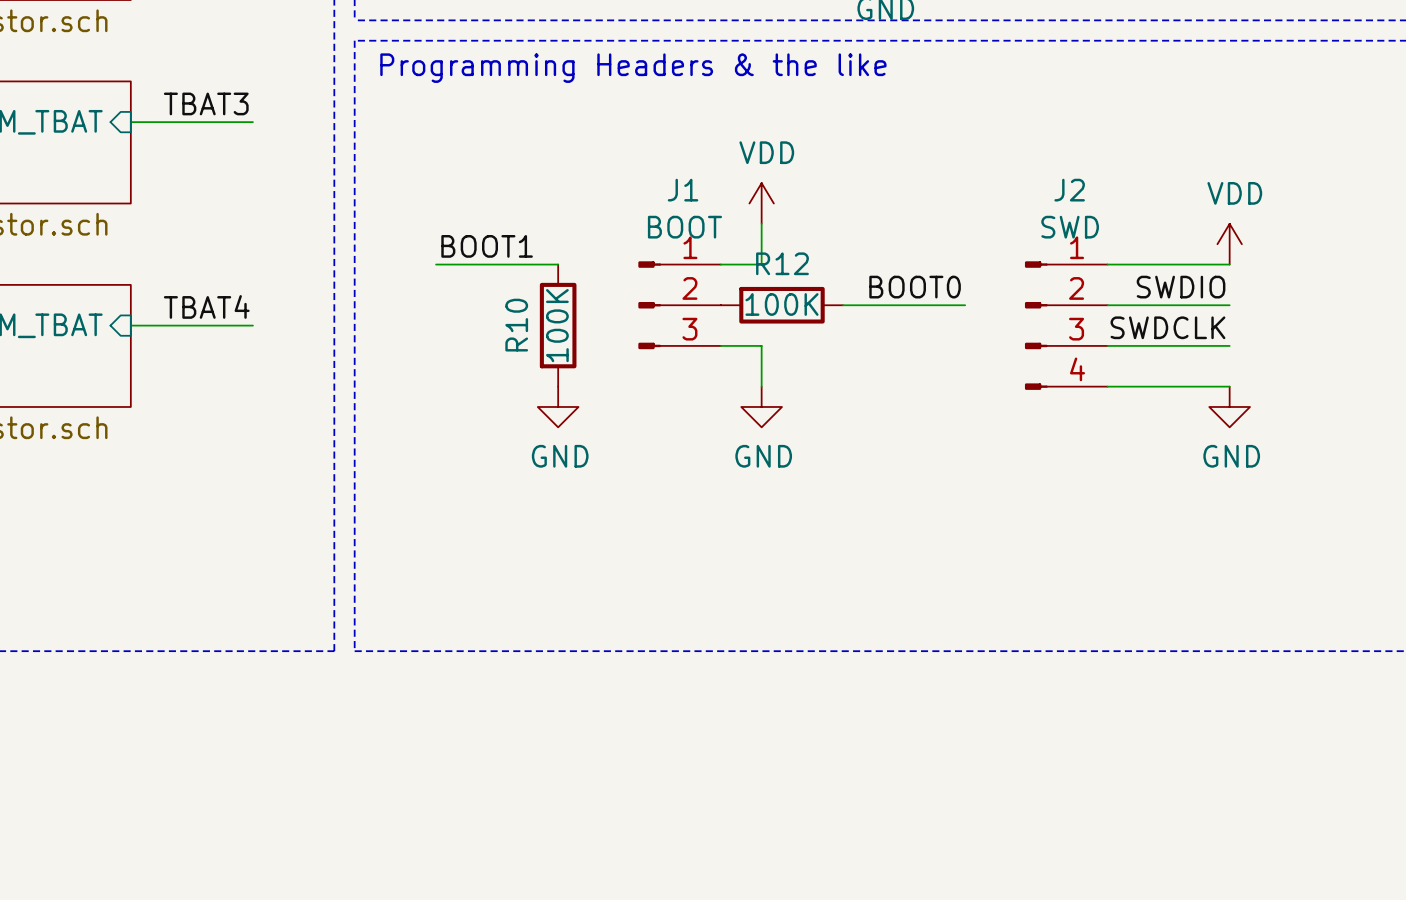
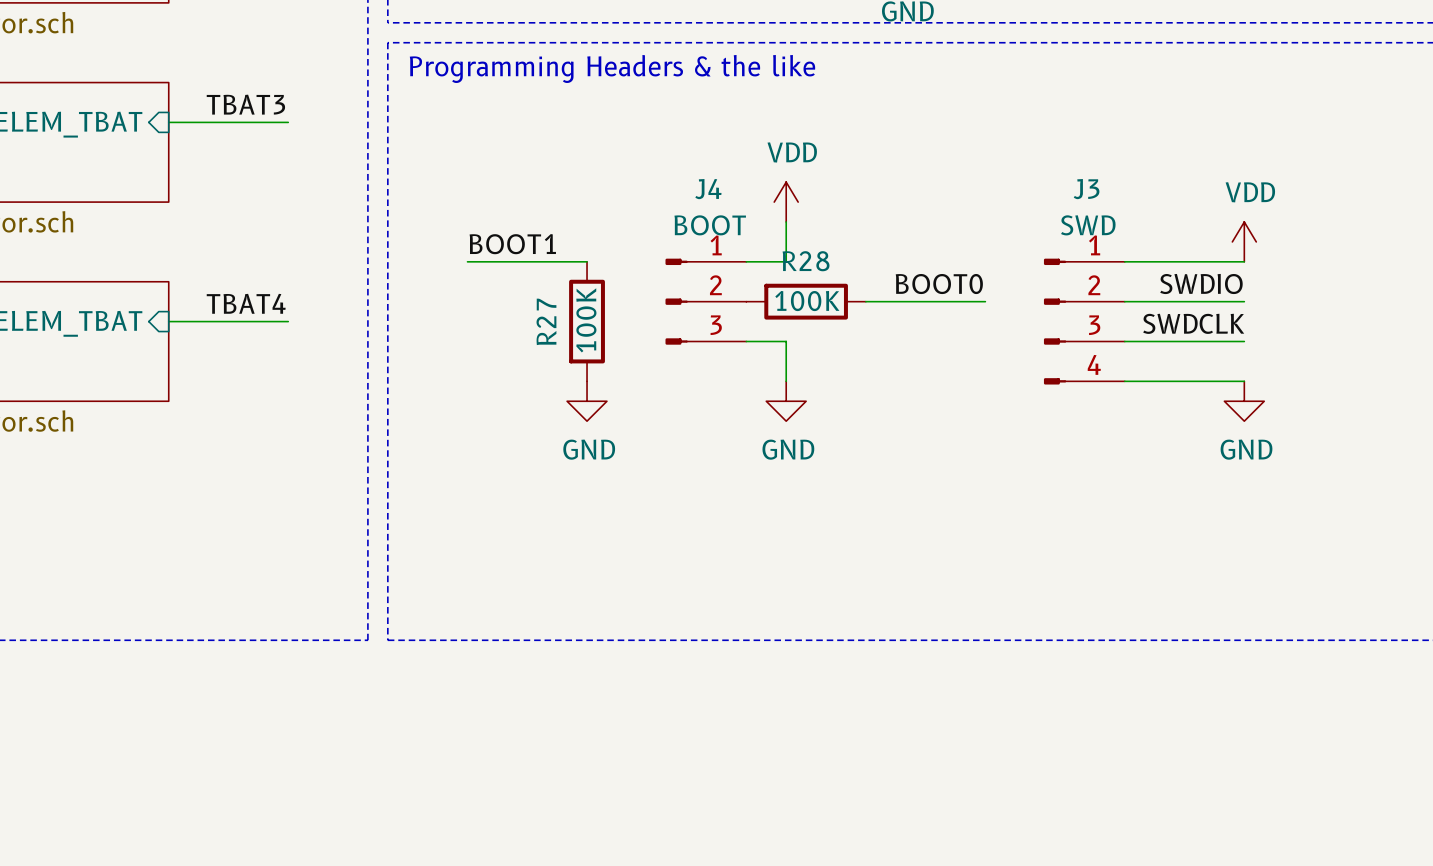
J1 name: J1 (683, 190) -> J4 (708, 189)
J2 name: J2 (1069, 190) -> J3 (1086, 189)
R12 name: R12 (782, 263) -> R28 (806, 261)
R10 name: R10 (516, 325) -> R27 (546, 321)

